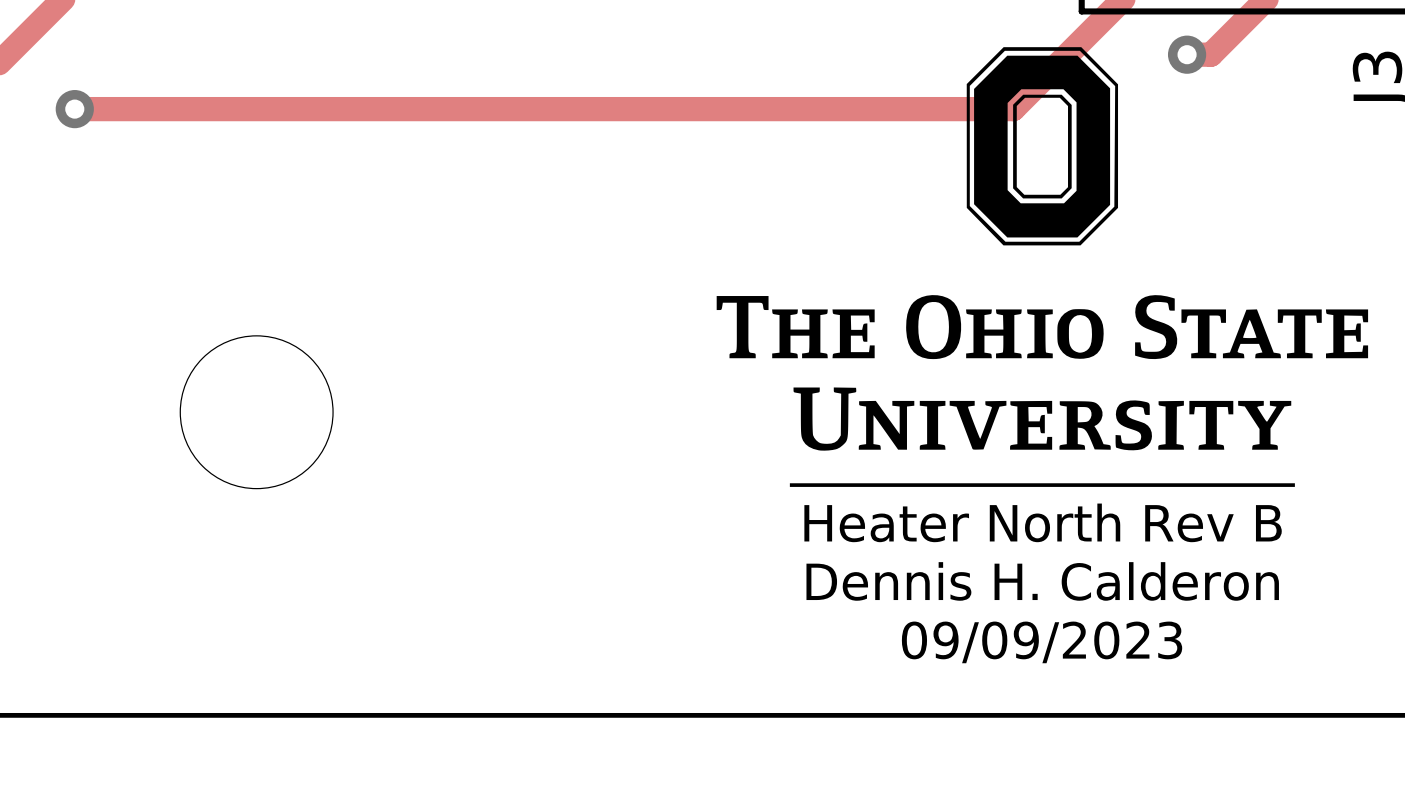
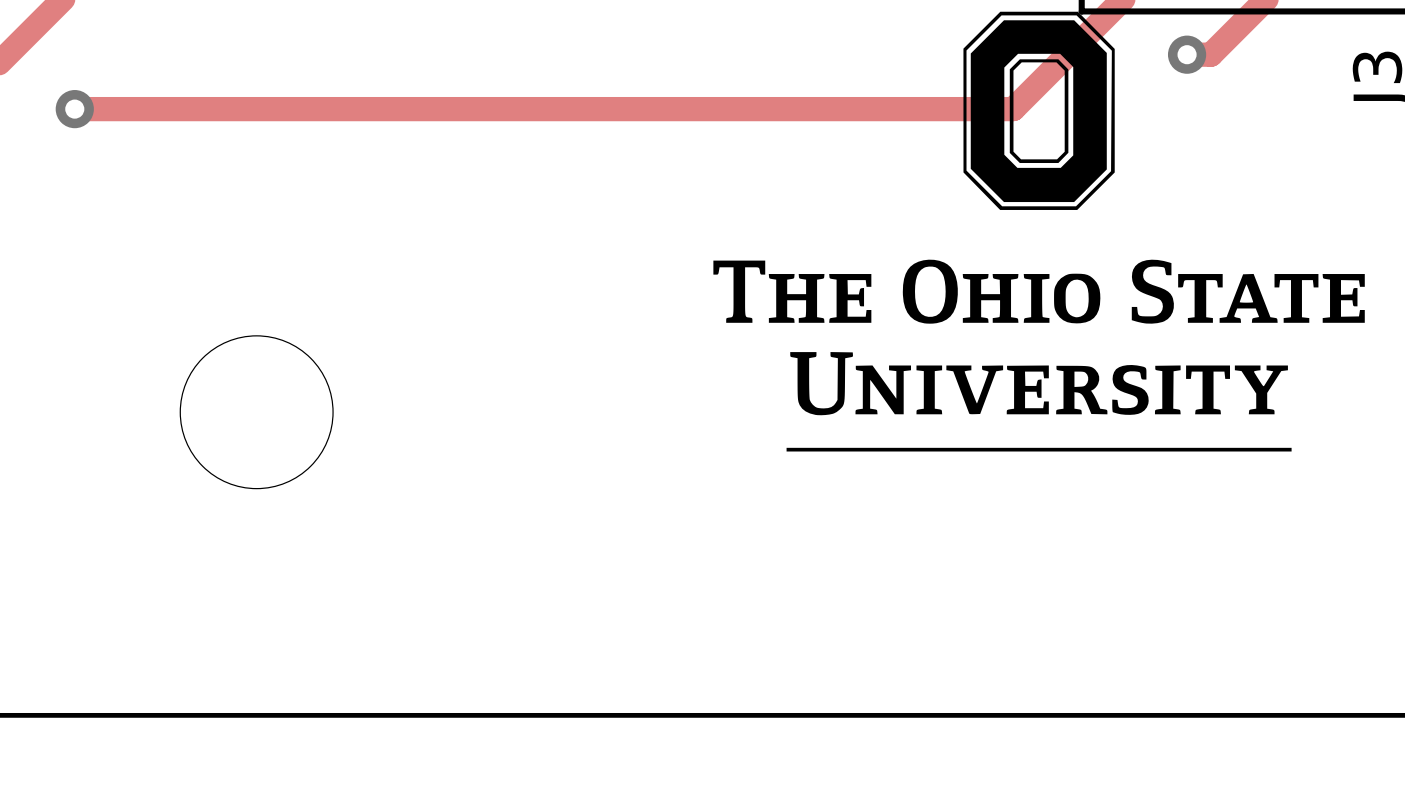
drawing position: (1042, 267) -> (1039, 231)
text: Heater North Rev B (1043, 522) -> none
text: Dennis H. Calderon (1042, 581) -> none
text: 09/09/2023 (1042, 642) -> none

